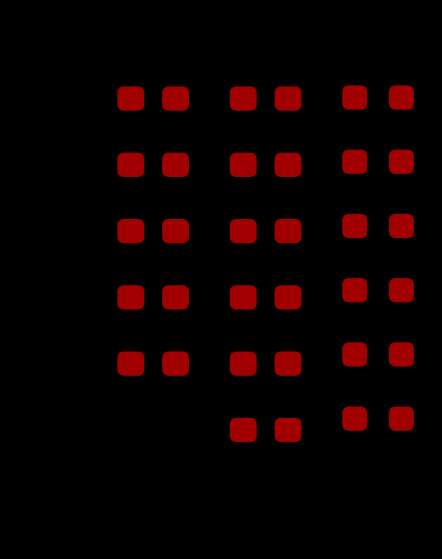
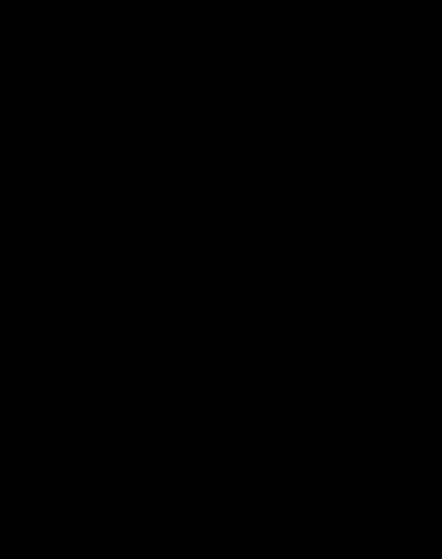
part: (378, 97) -> none
part: (153, 98) -> none
part: (265, 98) -> none
part: (378, 161) -> none
part: (153, 164) -> none
part: (265, 164) -> none
part: (378, 225) -> none
part: (153, 231) -> none
part: (265, 231) -> none
part: (378, 290) -> none
part: (153, 297) -> none
part: (265, 297) -> none
part: (378, 354) -> none
part: (153, 363) -> none
part: (265, 363) -> none
part: (378, 418) -> none
part: (265, 429) -> none

